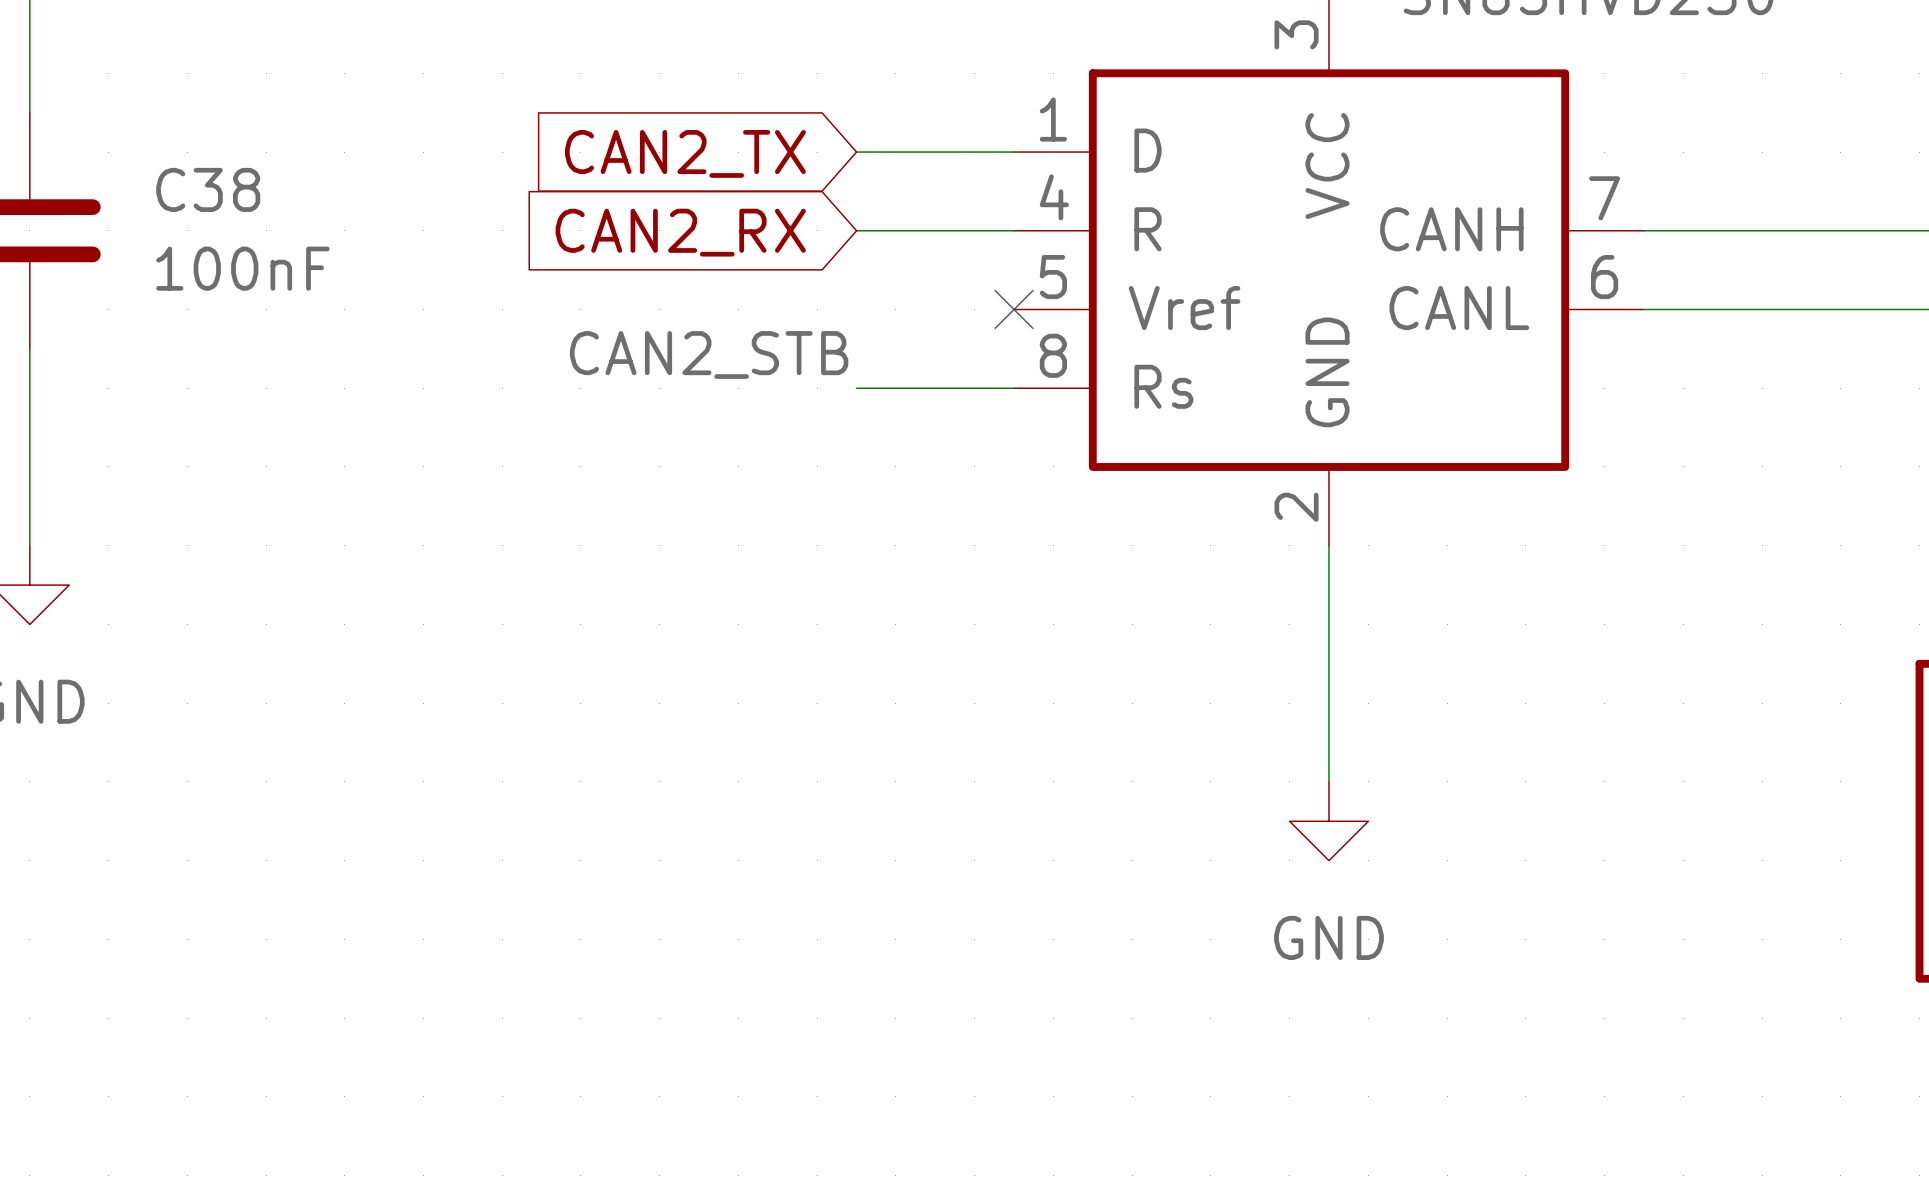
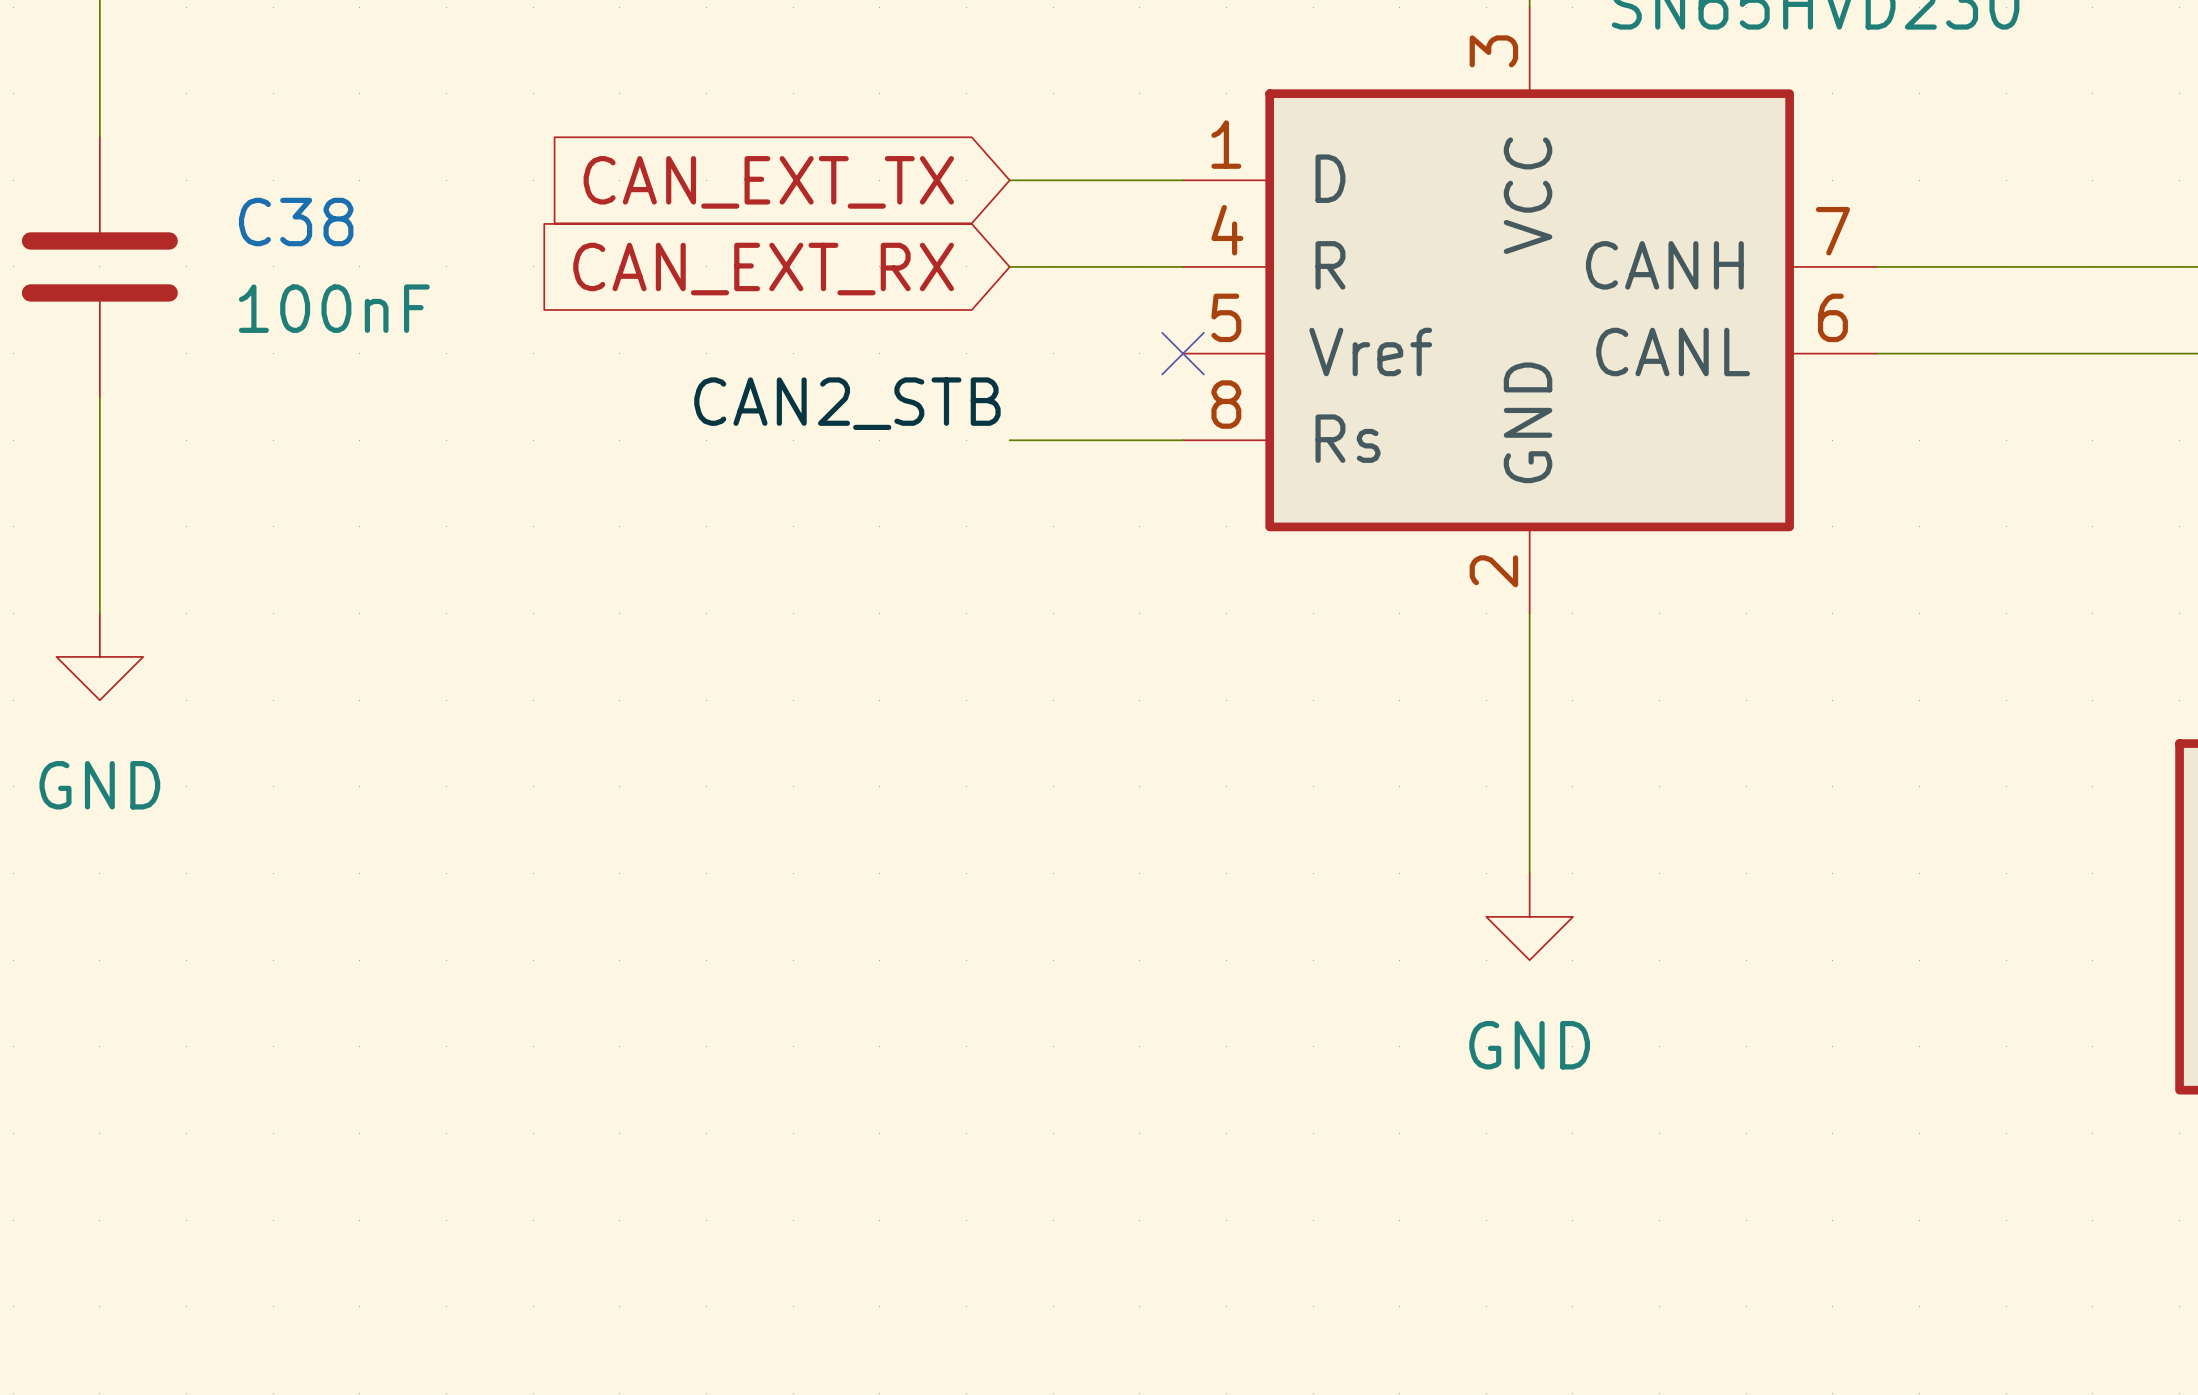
global label: CAN2_TX (685, 153) -> CAN_EXT_TX (768, 182)
global label: CAN2_RX (680, 232) -> CAN_EXT_RX (763, 269)

